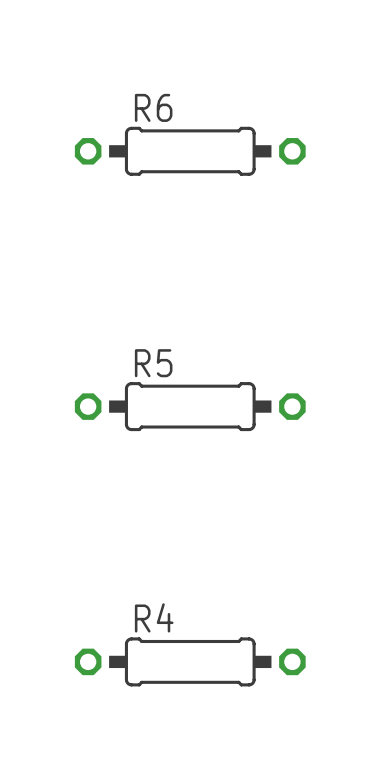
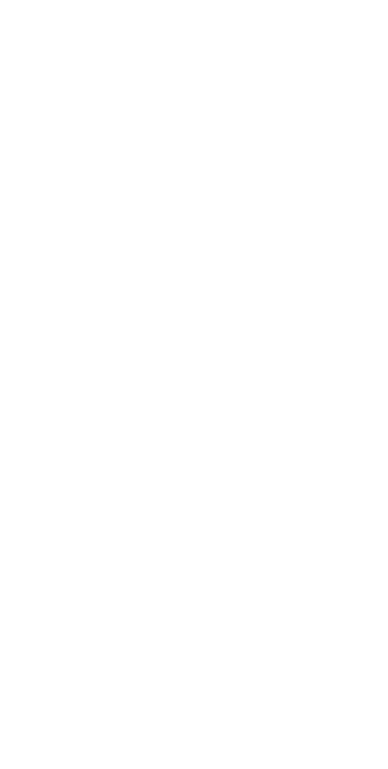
R6: (190, 151) -> none
R5: (190, 406) -> none
R4: (190, 661) -> none

